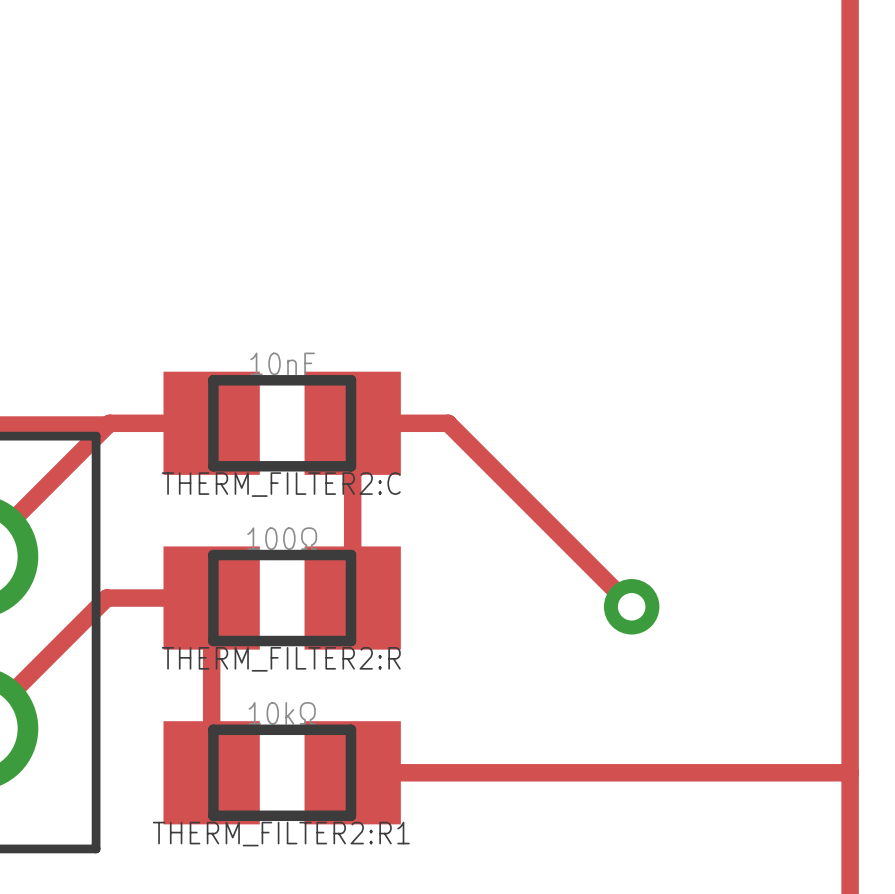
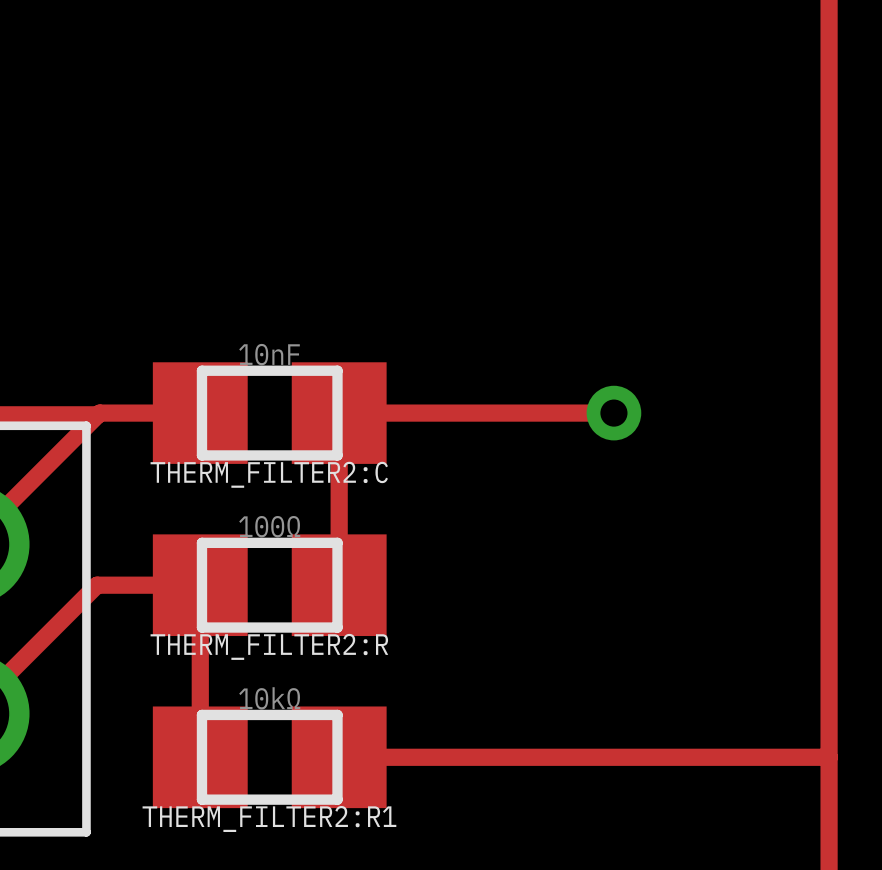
track: (448, 423) (631, 606) -> (433, 413) (613, 413)
via position: (631, 606) -> (613, 413)

